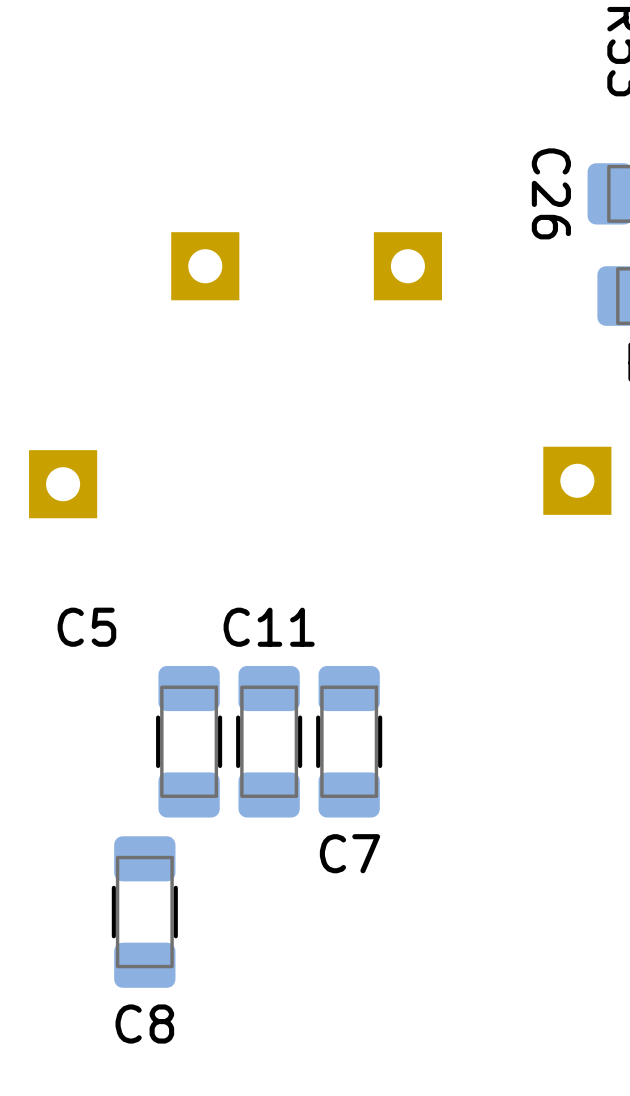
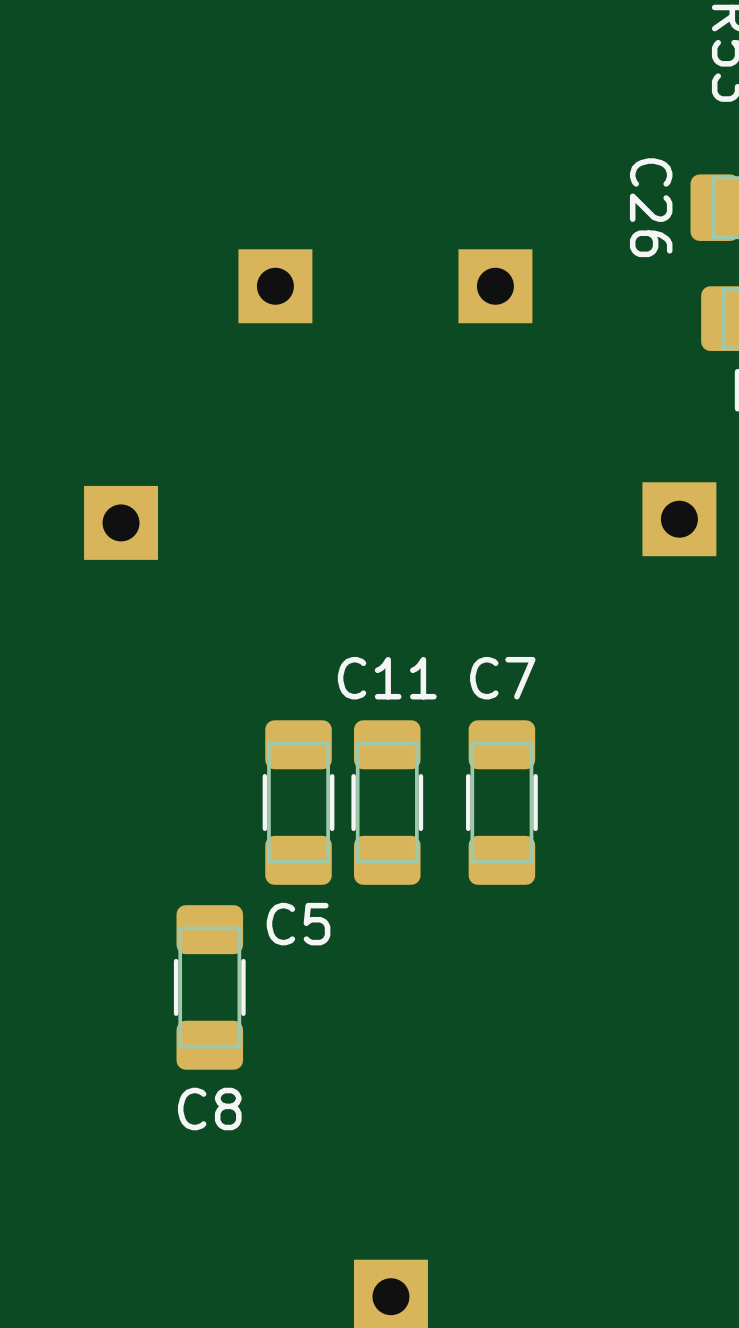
C5 name position: C5 (86, 627) -> C5 (298, 924)
C5 position: (189, 741) -> (298, 802)
C11 position: (269, 741) -> (387, 802)
C7 position: (349, 741) -> (501, 802)
C7 name position: C7 (349, 853) -> C7 (502, 678)

